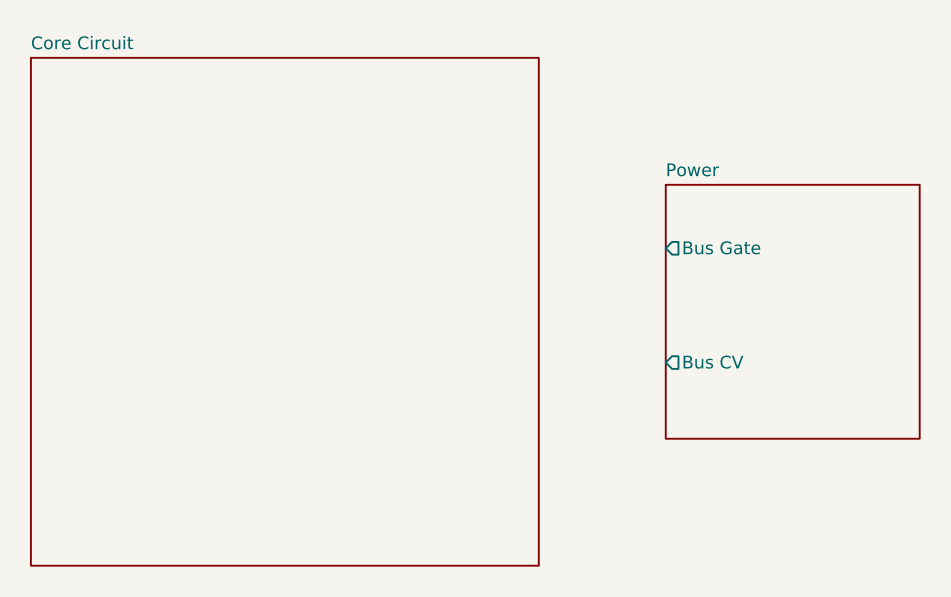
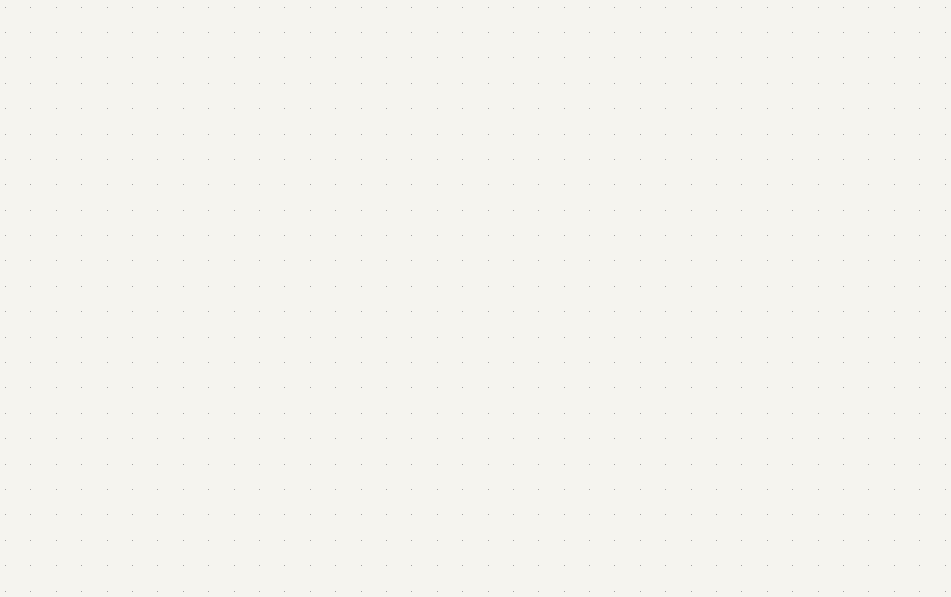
sheet pin: Bus Gate (721, 247) -> none
sheet Core Circuit: (284, 311) -> none
sheet Power: (792, 311) -> none
sheet pin: Bus CV (713, 362) -> none

